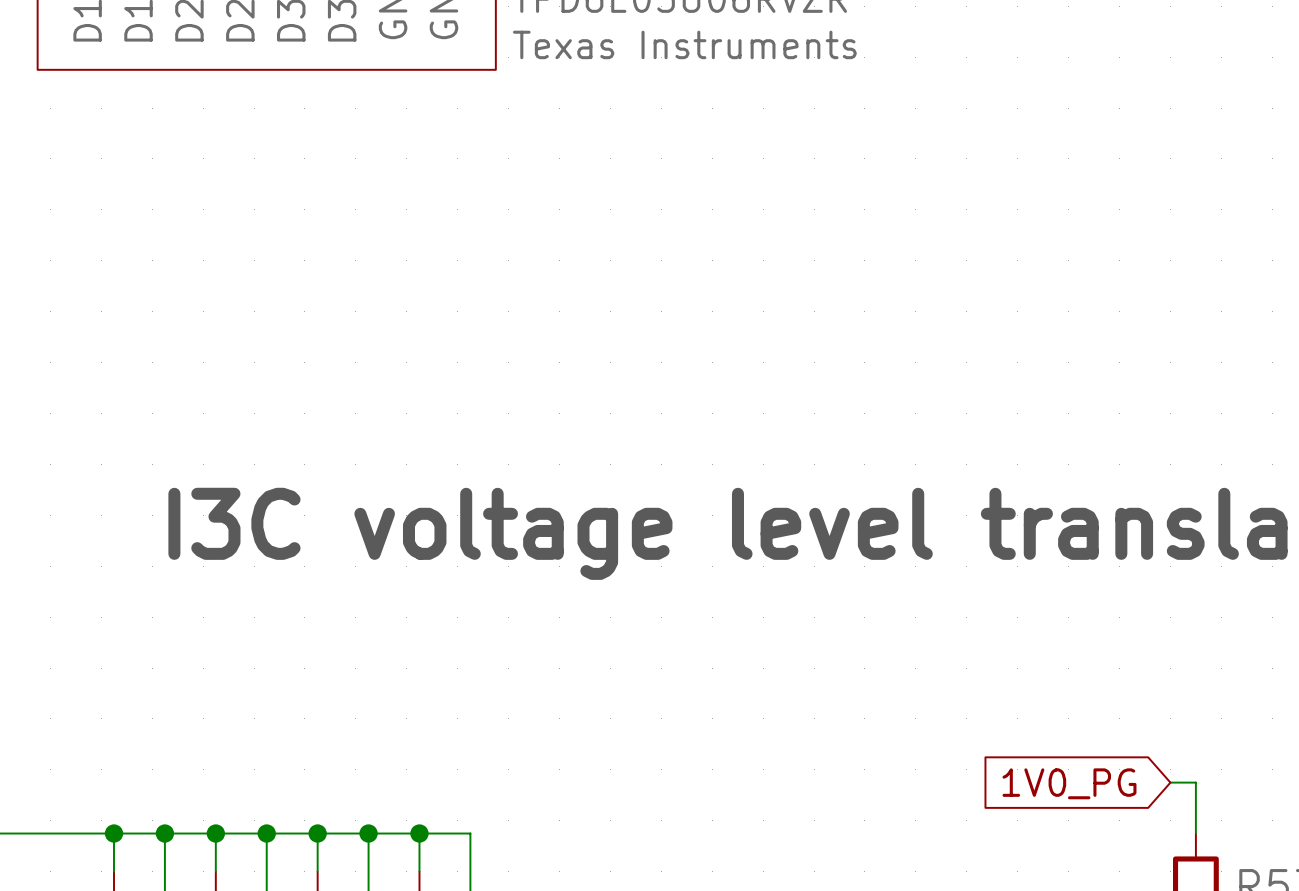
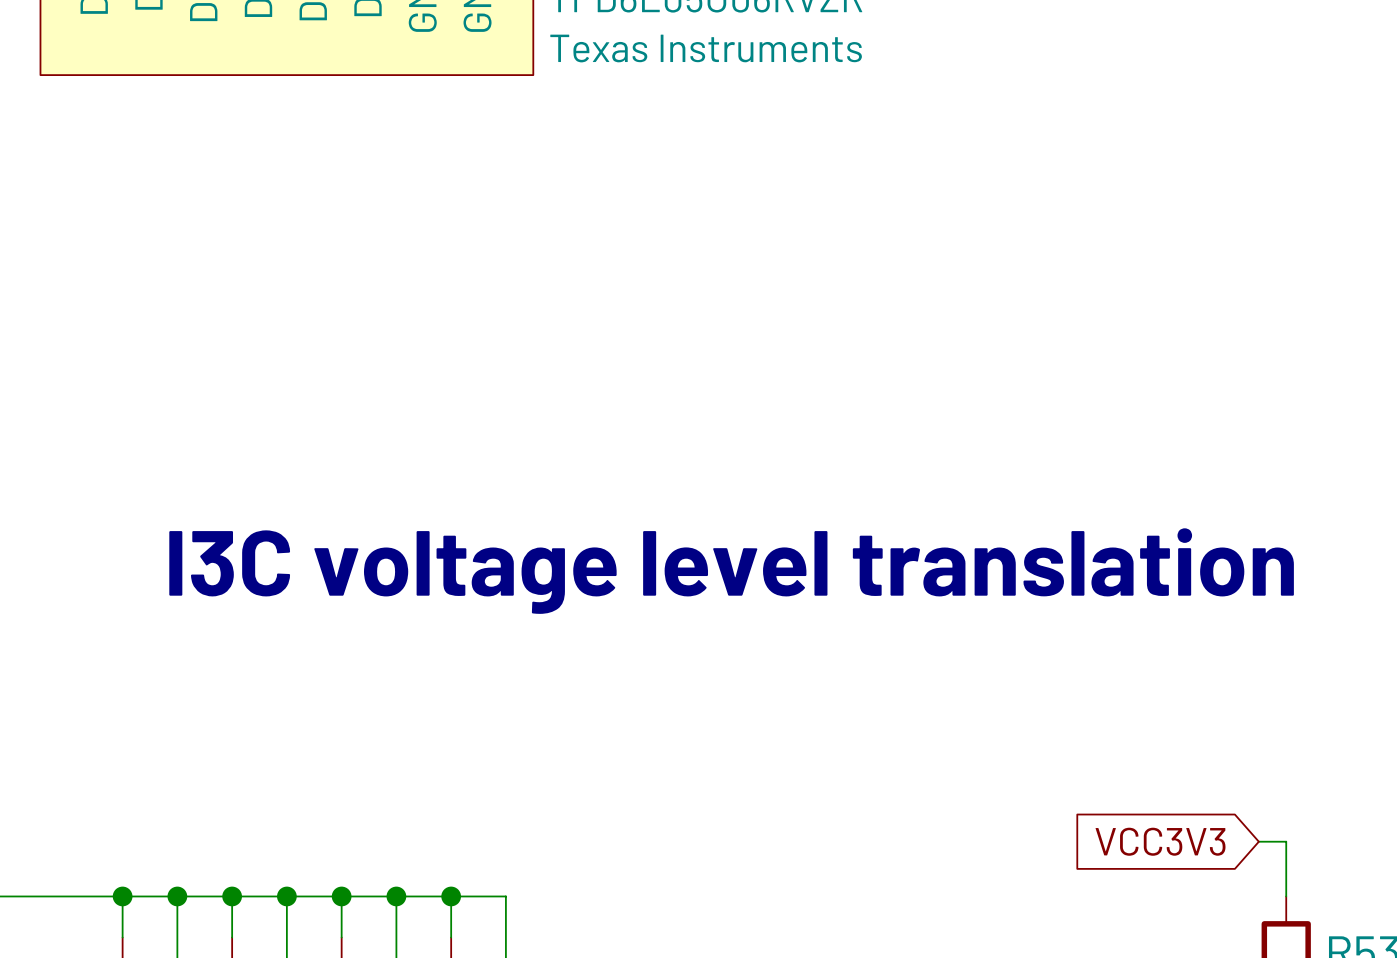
global label: 1V0_PG (1069, 783) -> VCC3V3 (1160, 841)

